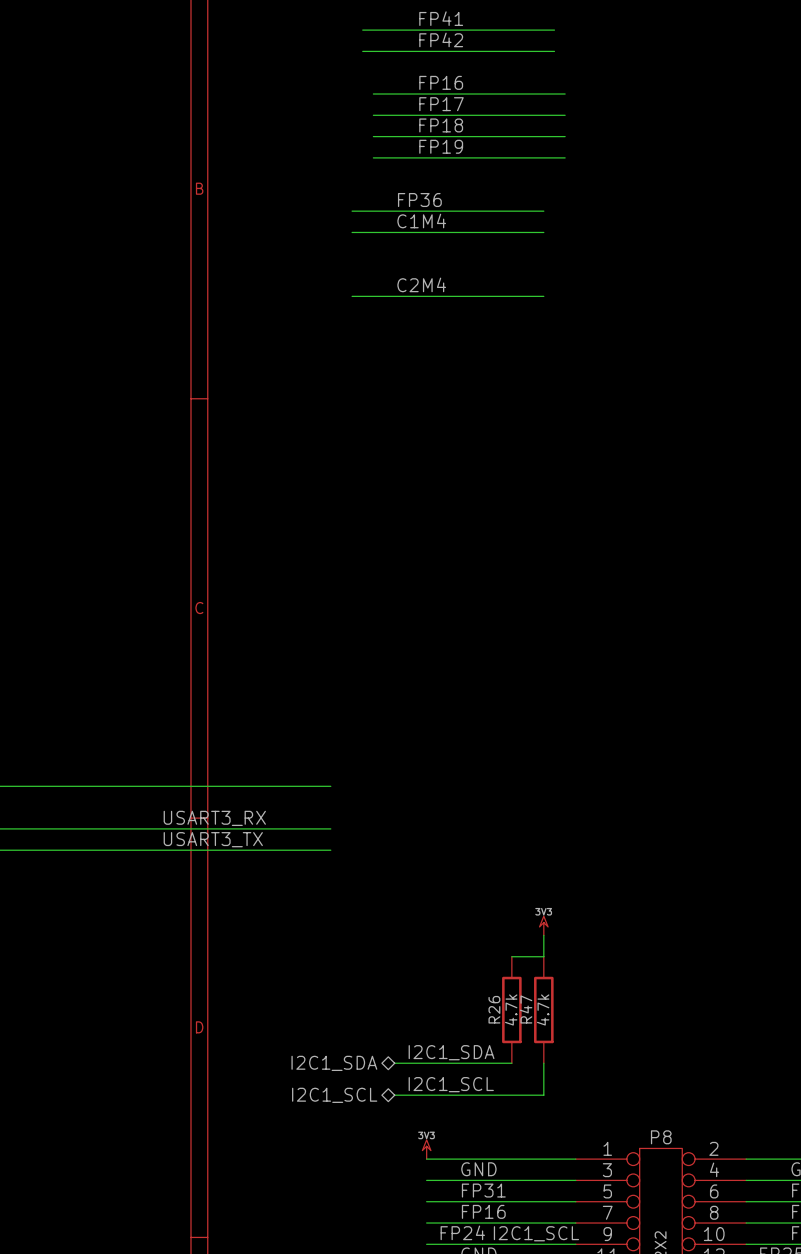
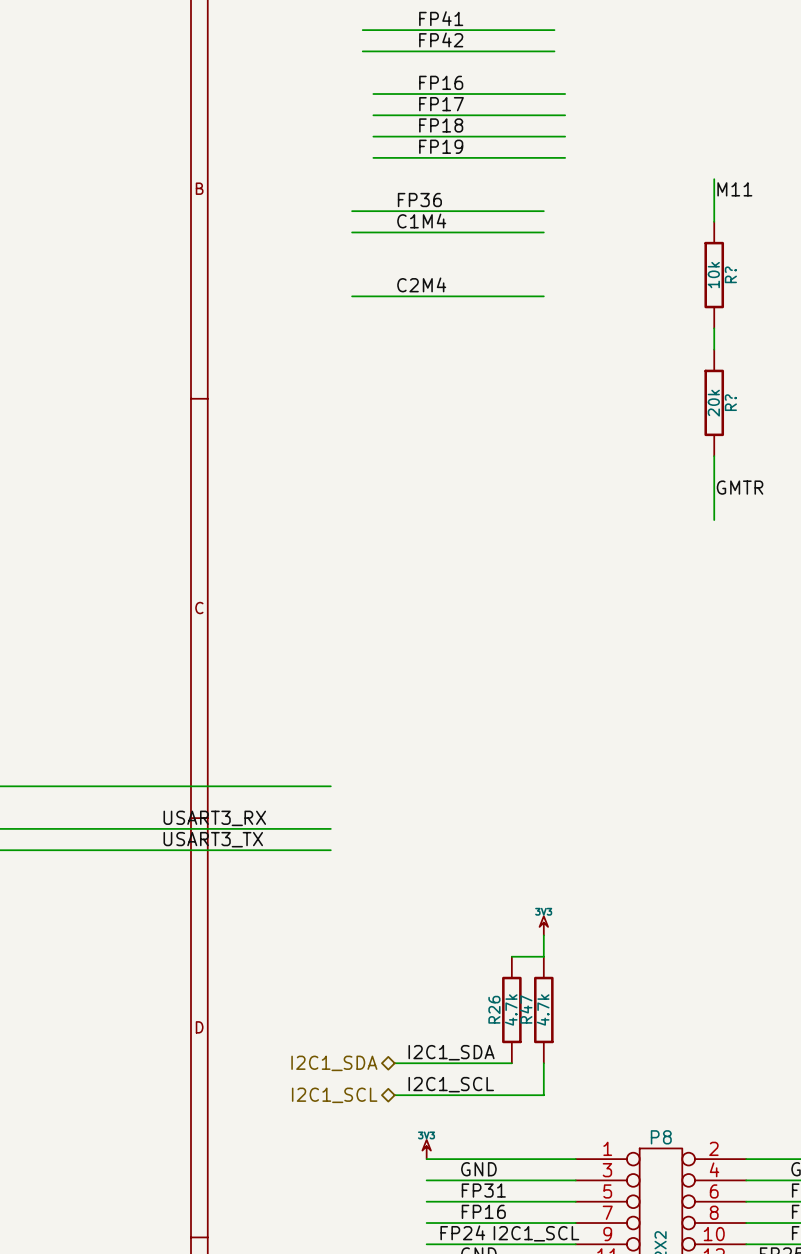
wire: none -> (714, 179) (714, 221)
label: none -> M11 (734, 189)
R?: none -> 10k (714, 275)
wire: none -> (714, 328) (714, 349)
R?: none -> 20k (714, 402)
wire: none -> (714, 456) (714, 520)
label: none -> GMTR (740, 487)

